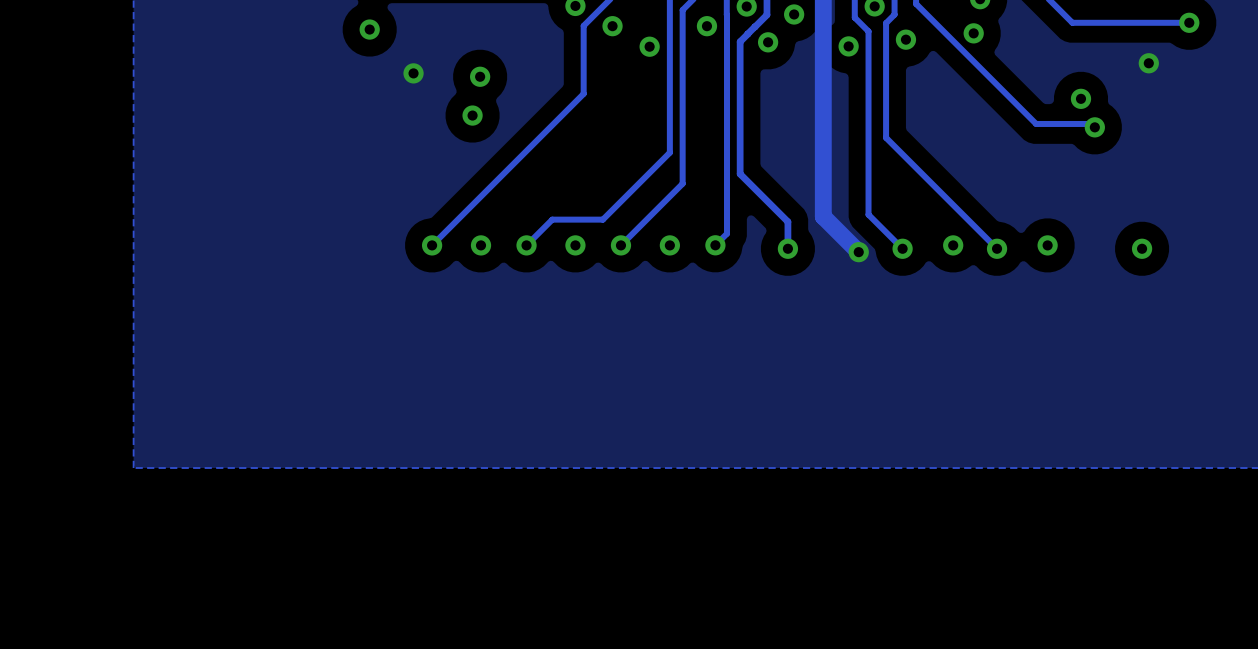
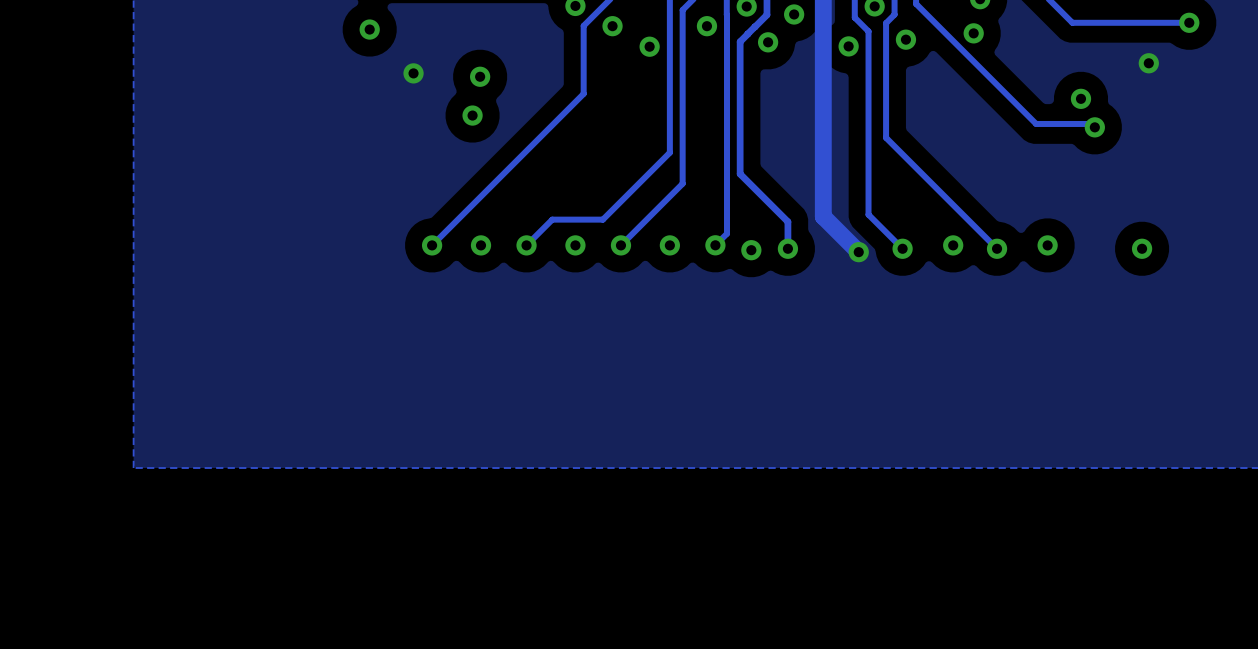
via: none -> (751, 250)

